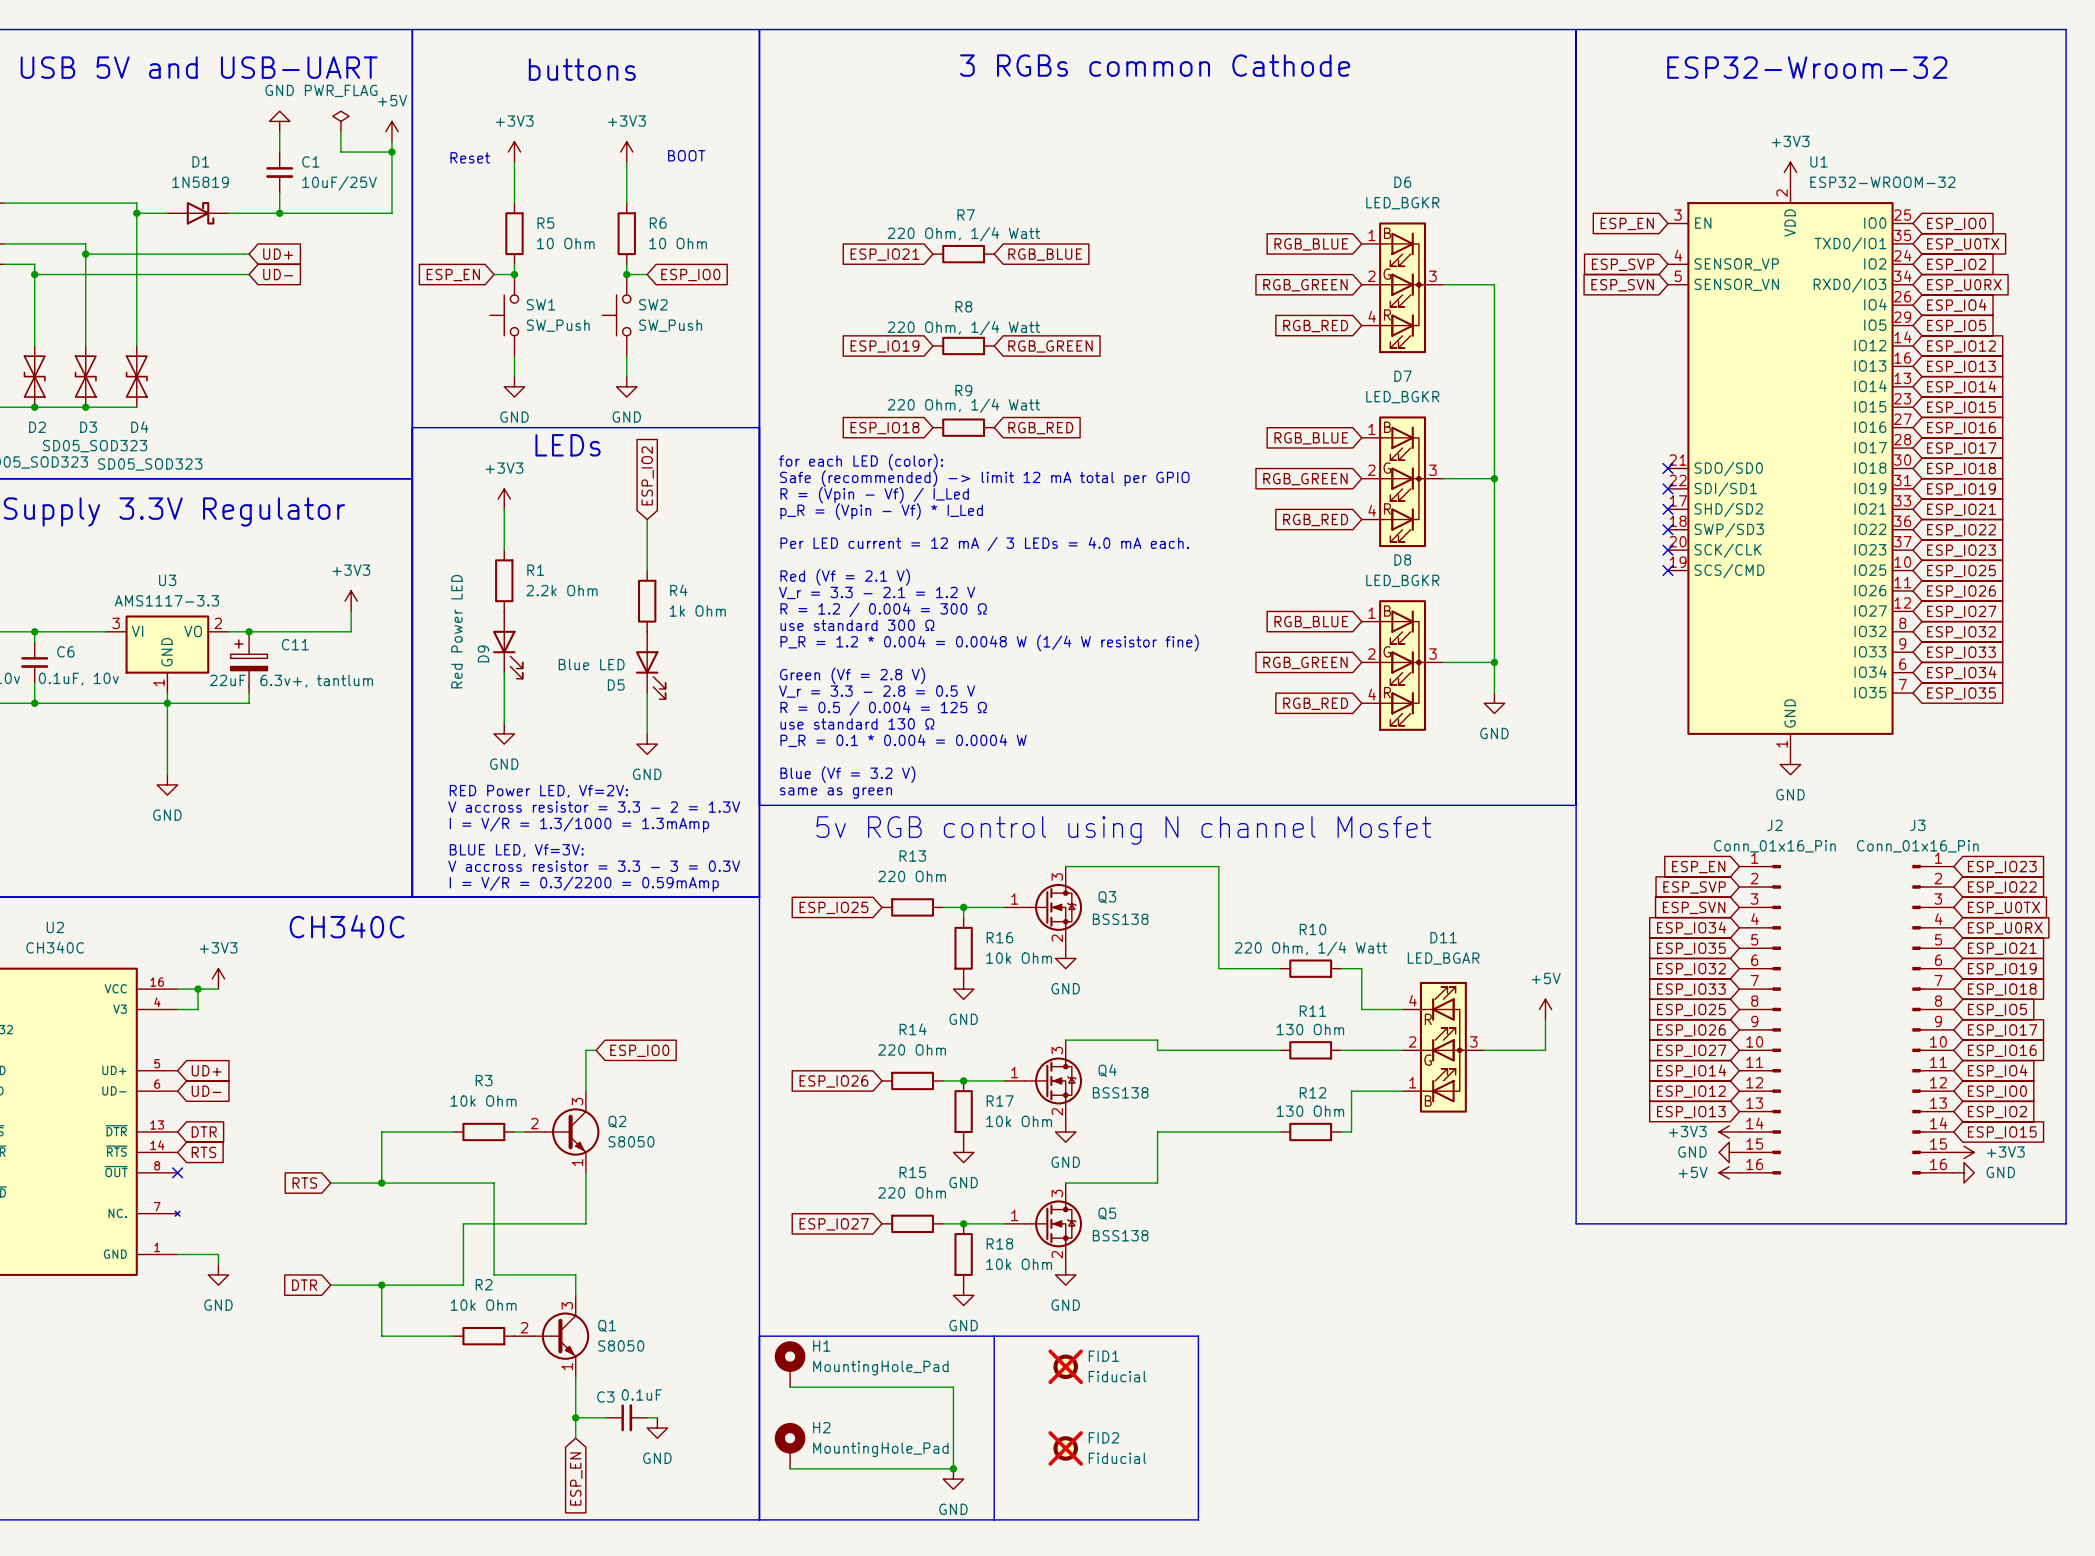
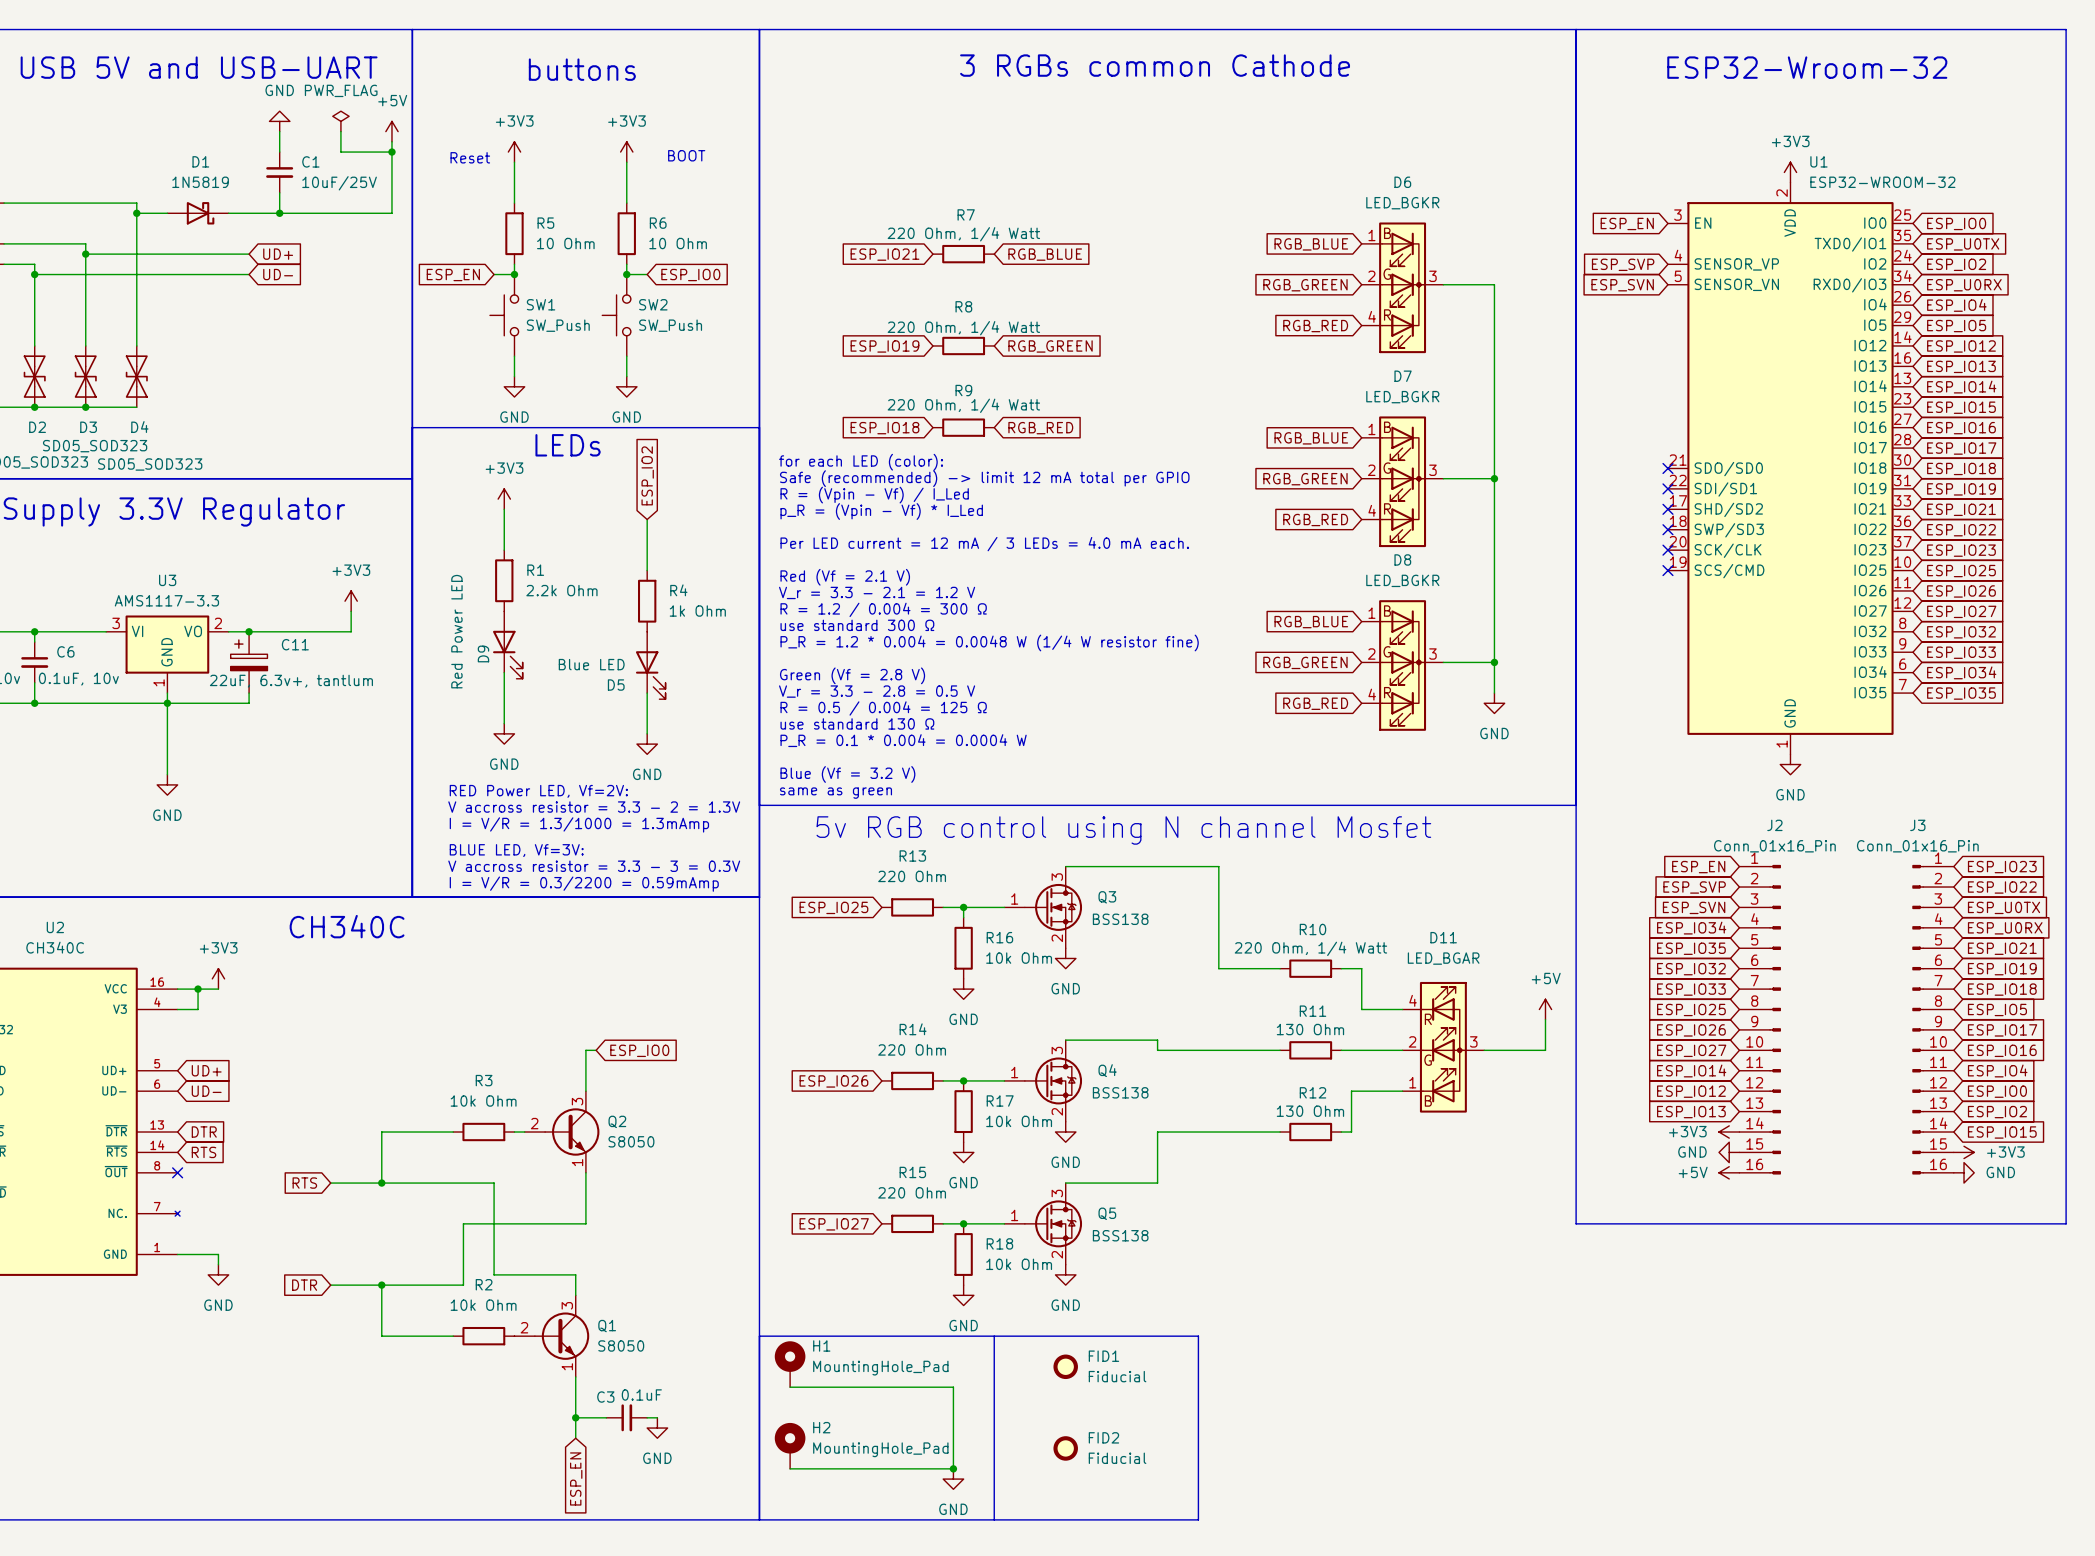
FID1 do-not-place cross: (1065, 1366) -> none
FID2 do-not-place cross: (1065, 1448) -> none

